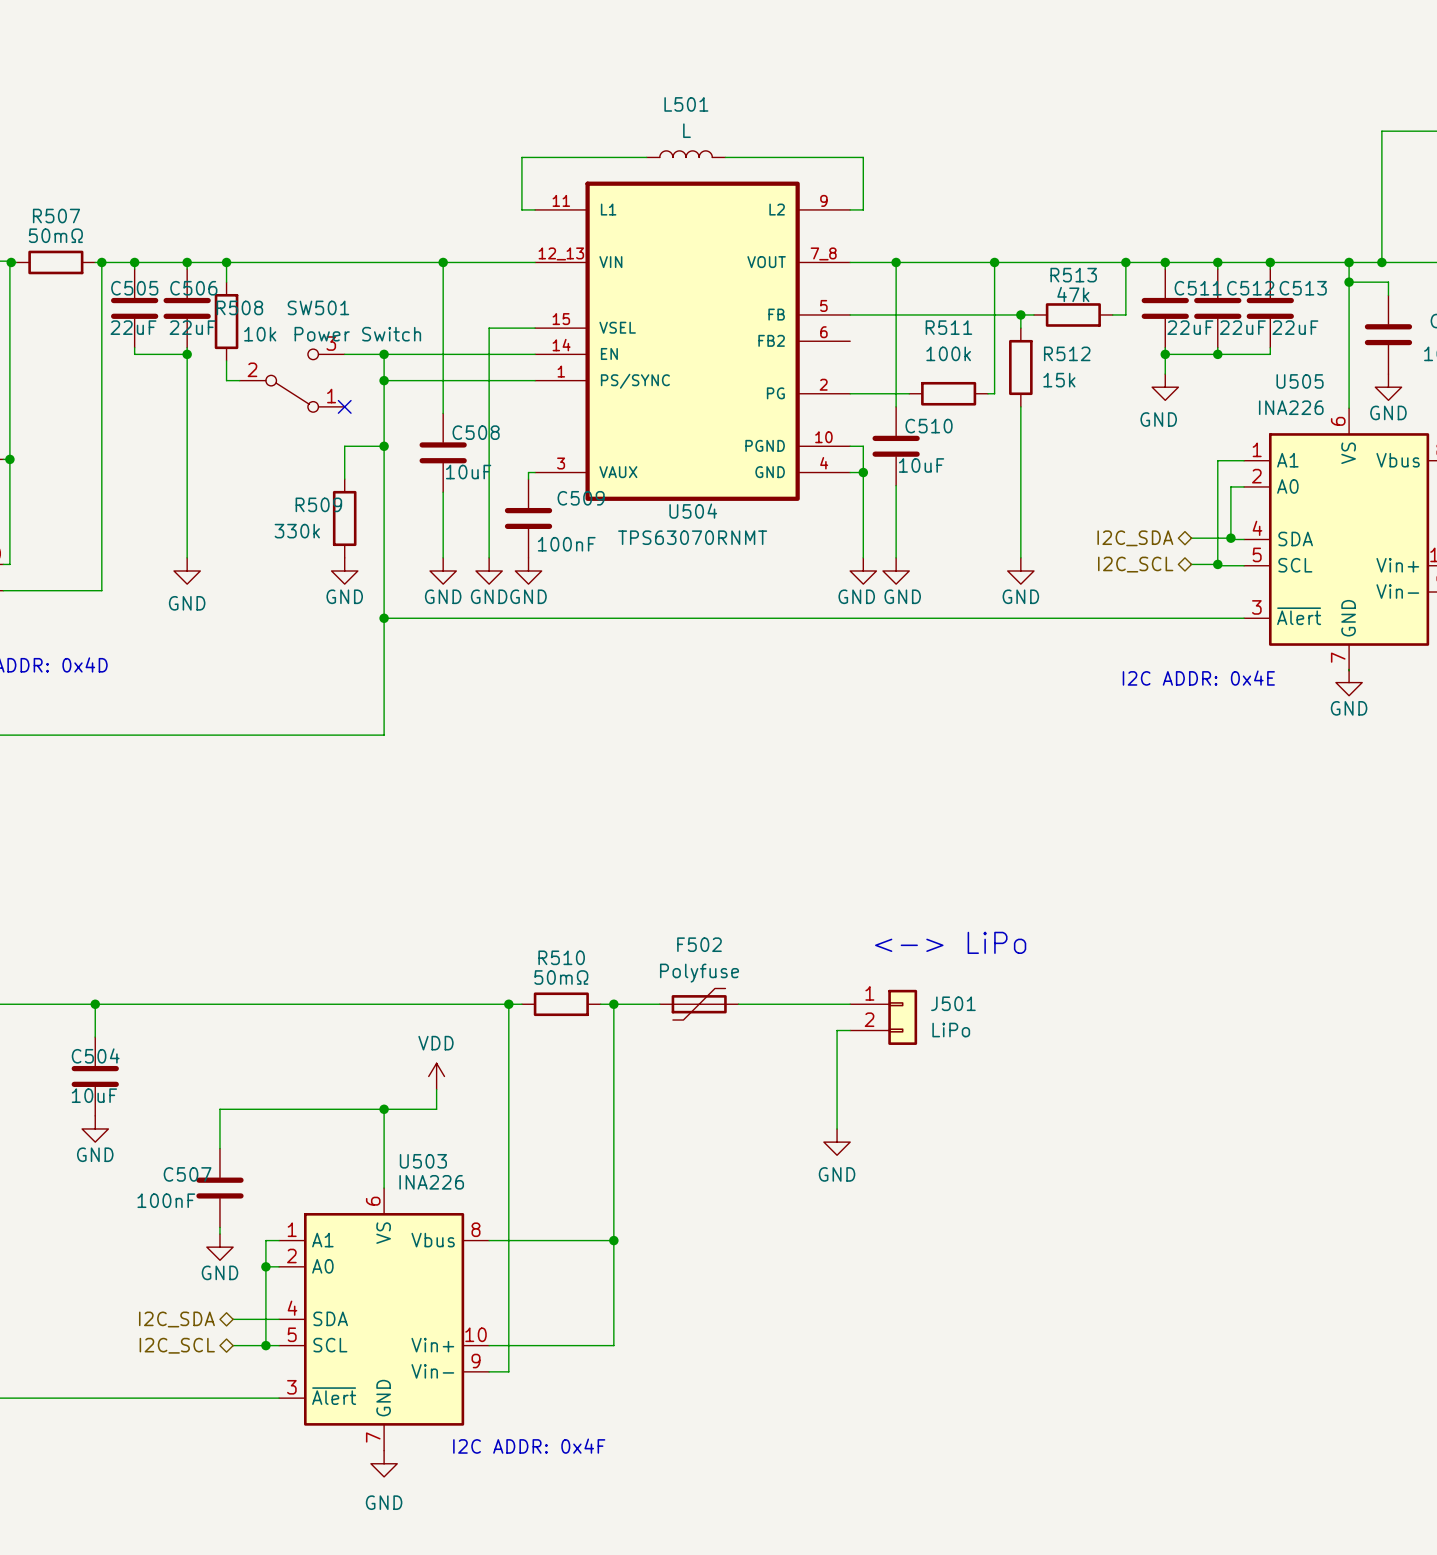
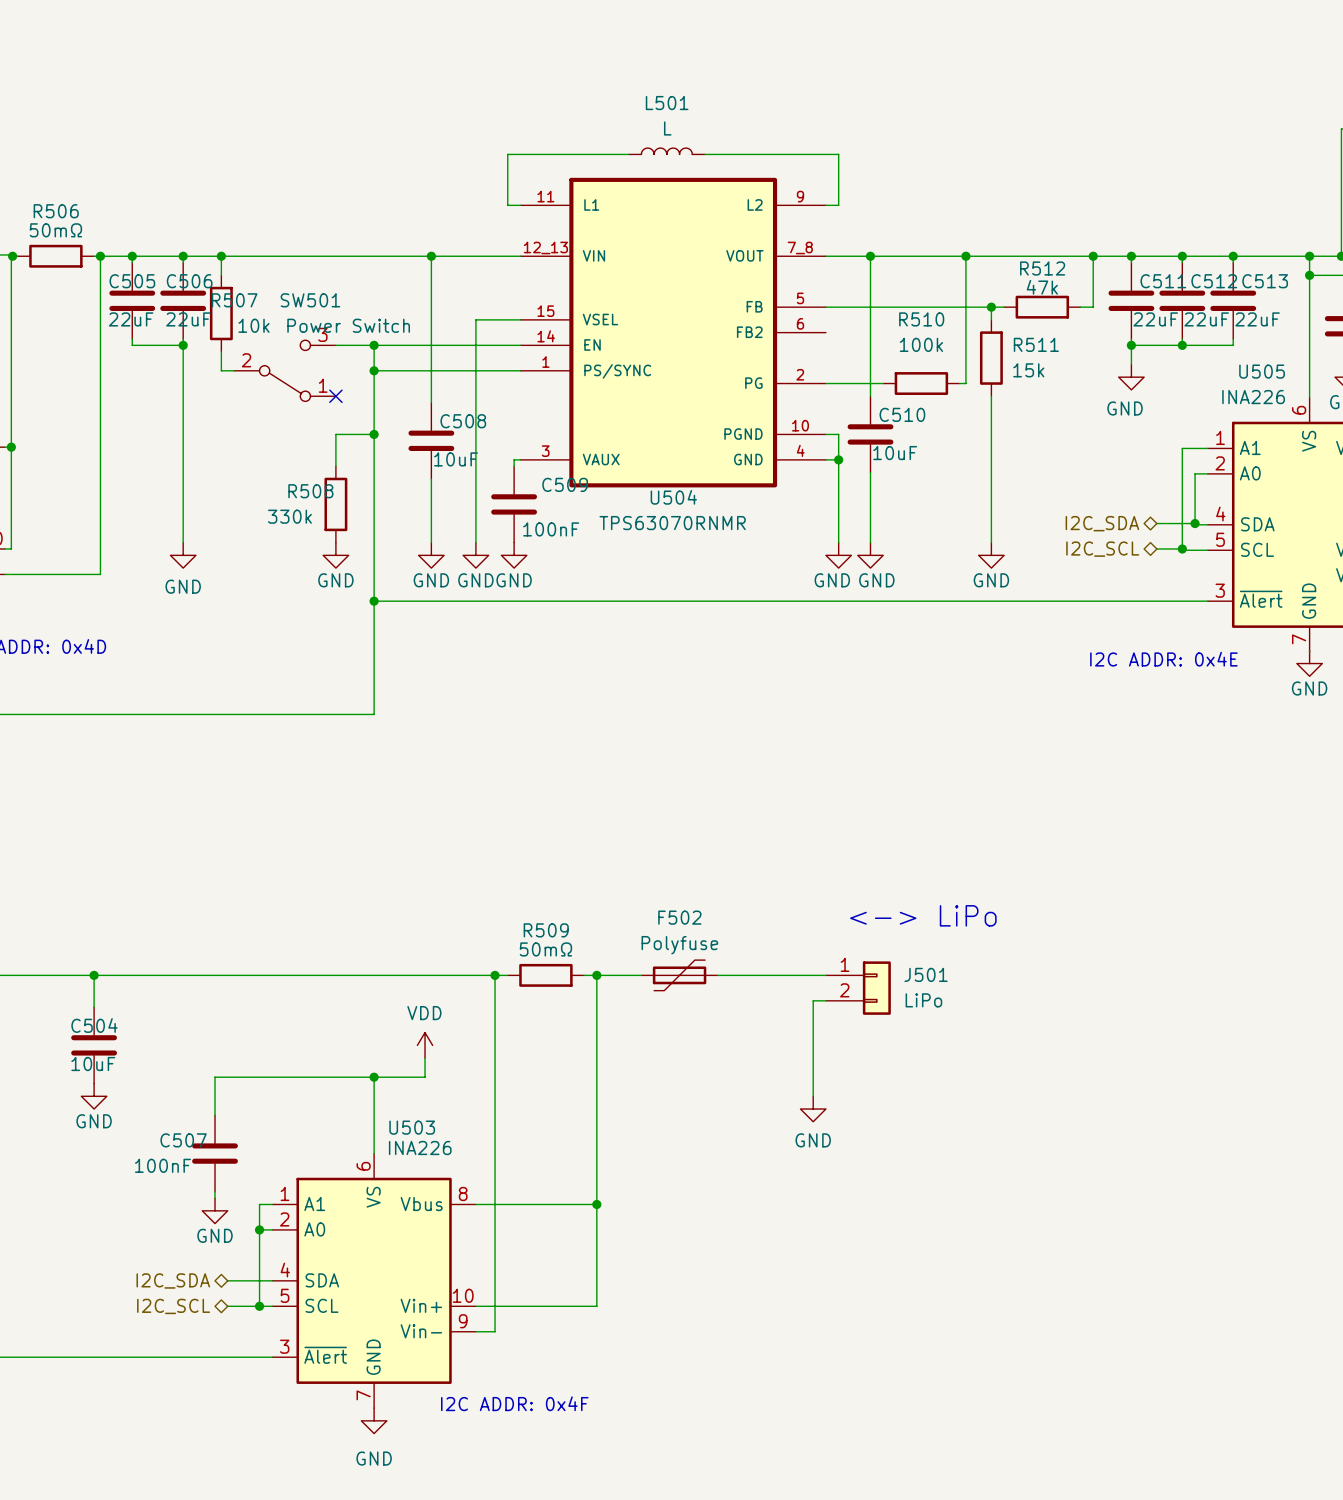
R507 name: R507 (56, 216) -> R506 (56, 211)
R513 name: R513 (1073, 275) -> R512 (1042, 268)
R508 name: R508 (239, 307) -> R507 (234, 300)
R511 name: R511 (948, 327) -> R510 (921, 319)
R512 name: R512 (1067, 353) -> R511 (1036, 344)
R509 name: R509 (318, 504) -> R508 (310, 491)
U504 value: TPS63070RNMT (692, 537) -> TPS63070RNMR (672, 523)
R510 name: R510 (561, 957) -> R509 (546, 930)

